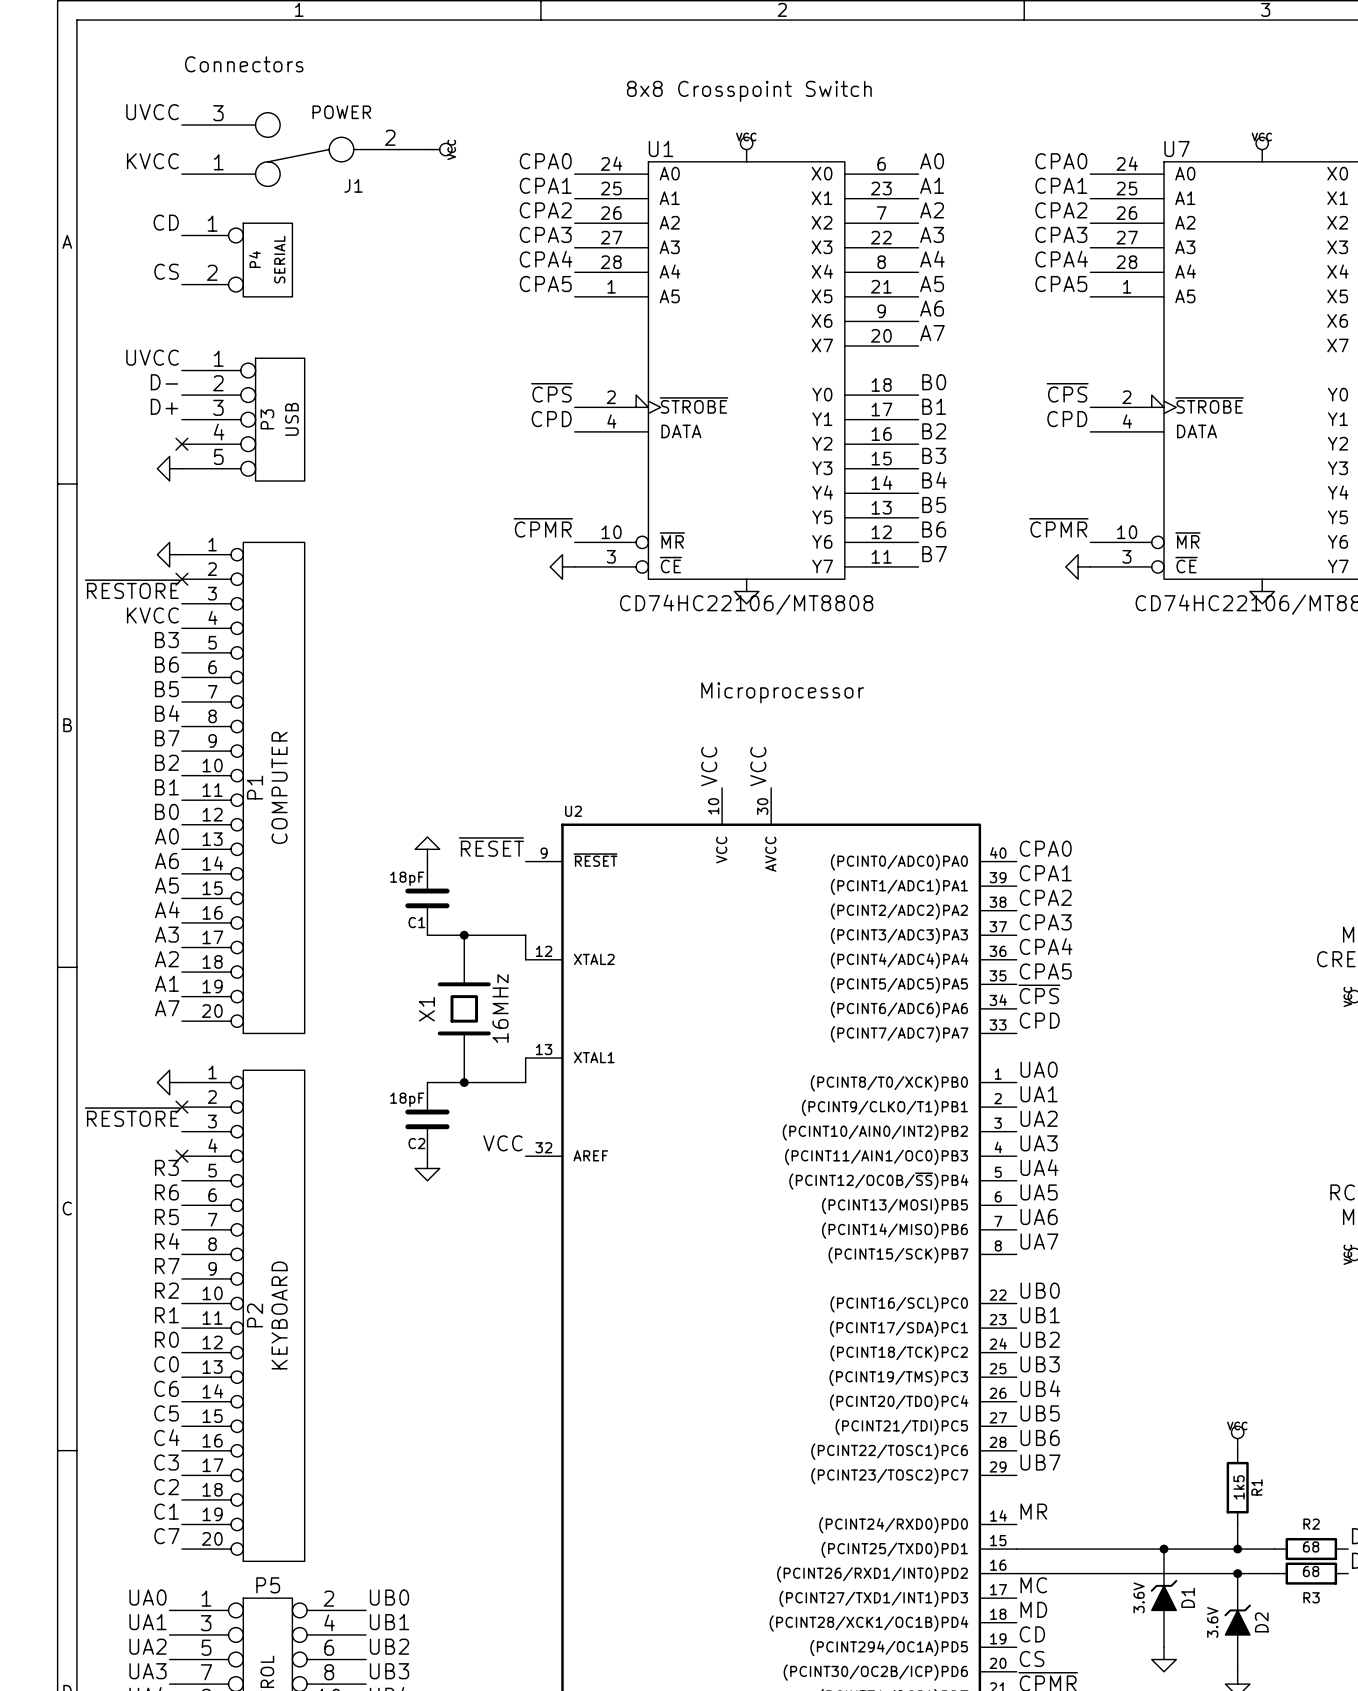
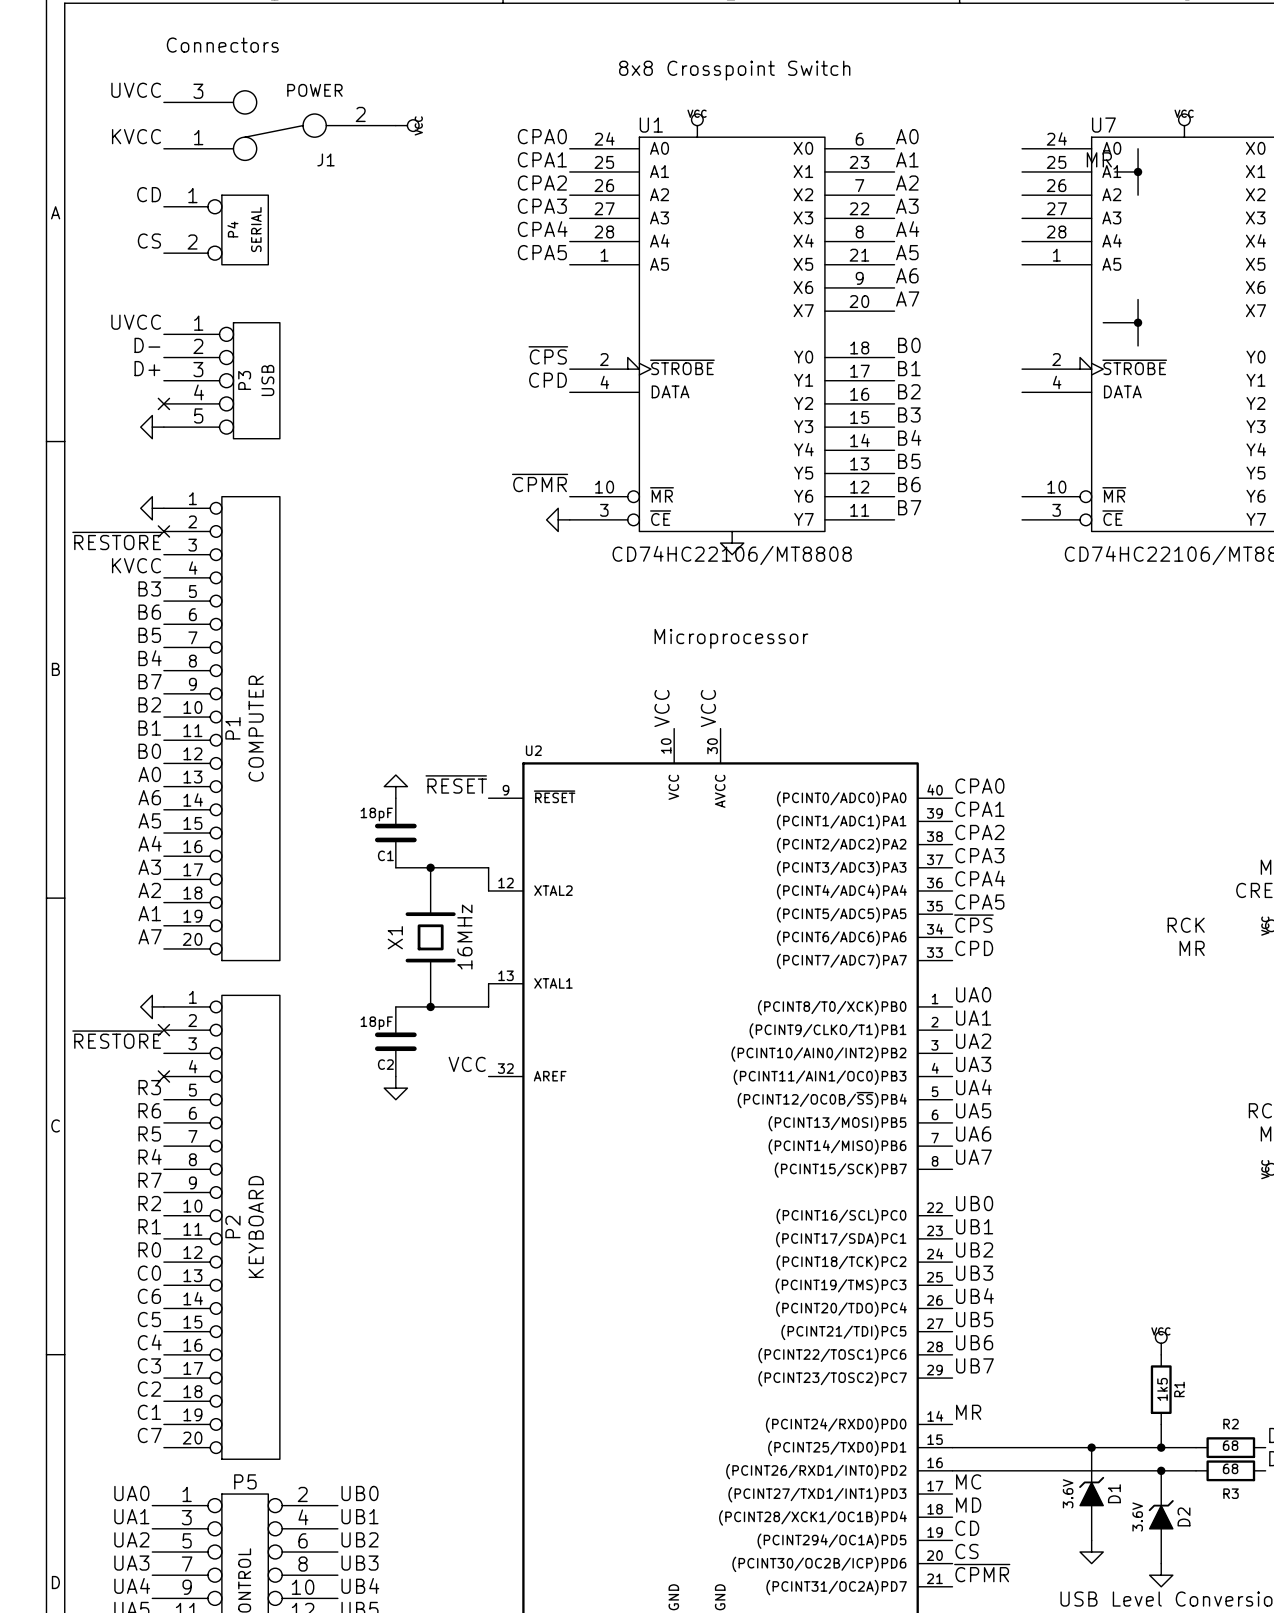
text position: 8x8 Crosspoint Switch (749, 91) -> 8x8 Crosspoint Switch (734, 70)
label position: CPA0 (545, 161) -> CPA0 (542, 136)
label position: A0 (932, 161) -> A0 (907, 136)
label: CPA0 (1061, 161) -> none
wire: none -> (1138, 148) (1138, 195)
label position: CPA1 (545, 185) -> CPA1 (542, 159)
label position: A1 (932, 185) -> A1 (907, 159)
label: CPA1 (1061, 185) -> none
label: none -> MR (1099, 159)
wire: none -> (1114, 171) (1138, 171)
junction: none -> (1138, 171)
label position: CPA2 (545, 210) -> CPA2 (542, 183)
label position: A2 (932, 210) -> A2 (907, 183)
label: CPA2 (1061, 210) -> none
label position: CPA3 (545, 234) -> CPA3 (542, 206)
label position: A3 (932, 234) -> A3 (907, 206)
label: CPA3 (1061, 234) -> none
label position: CPA4 (546, 259) -> CPA4 (542, 229)
label position: A4 (932, 259) -> A4 (907, 229)
label: CPA4 (1061, 259) -> none
label position: CPA5 (545, 284) -> CPA5 (542, 252)
label position: A5 (932, 284) -> A5 (907, 252)
label: CPA5 (1061, 284) -> none
label position: A6 (932, 308) -> A6 (907, 275)
label position: A7 (932, 333) -> A7 (907, 299)
wire: none -> (1138, 299) (1138, 345)
wire: none -> (1103, 322) (1138, 322)
junction: none -> (1138, 322)
U1 position: (746, 370) -> (732, 334)
label position: B0 (934, 382) -> B0 (909, 345)
label position: ~{CPS} (552, 392) -> ~{CPS} (548, 355)
label: ~{CPS} (1067, 392) -> none
label position: B1 (934, 406) -> B1 (909, 368)
label position: CPD (551, 419) -> CPD (548, 380)
label: CPD (1067, 419) -> none
label position: B2 (934, 431) -> B2 (909, 391)
label position: B3 (934, 455) -> B3 (909, 414)
label position: B4 (934, 480) -> B4 (909, 437)
label position: B5 (934, 504) -> B5 (909, 461)
label position: ~{CPMR} (543, 527) -> ~{CPMR} (540, 482)
label: ~{CPMR} (1058, 527) -> none
label position: B6 (934, 529) -> B6 (909, 484)
label position: B7 (934, 554) -> B7 (909, 507)
power symbol position: (562, 566) -> (558, 519)
power symbol: (1078, 566) -> none
power symbol position: (746, 591) -> (732, 543)
power symbol: (1262, 591) -> none
label: none -> RCK (1186, 925)
label: none -> MR (1192, 948)

